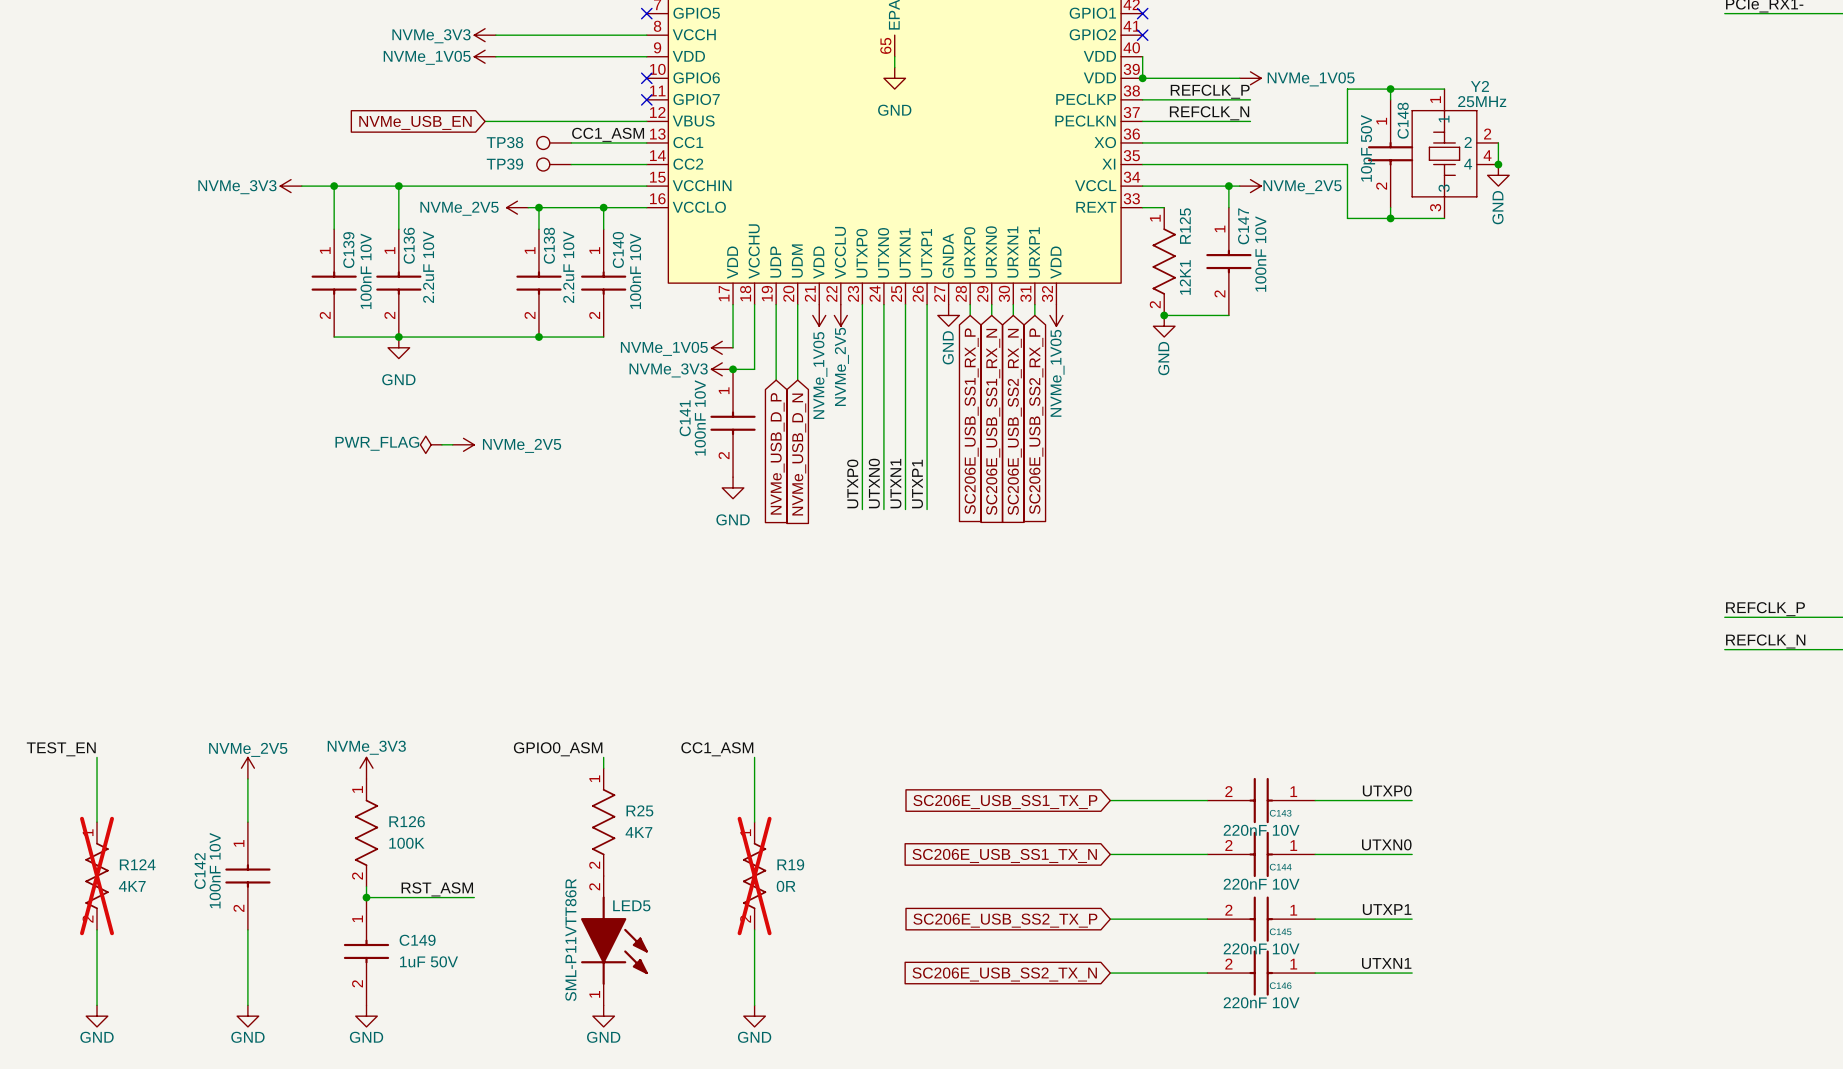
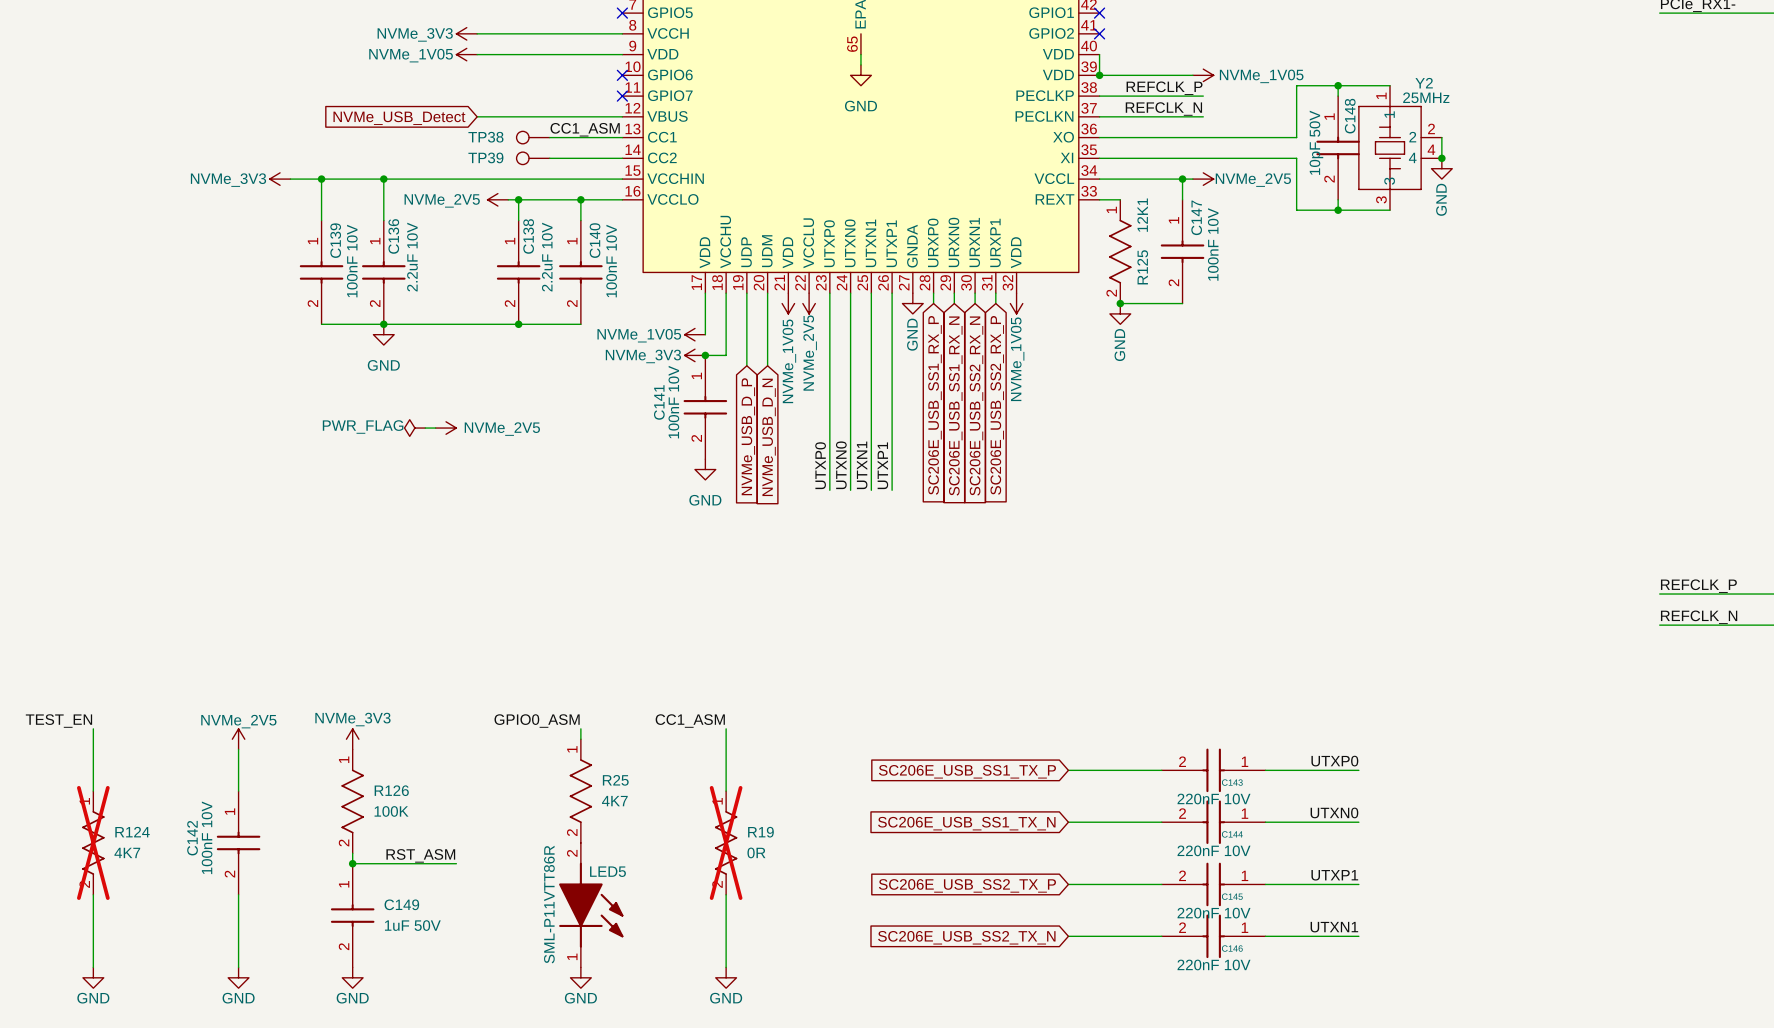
wire: (485, 121) (495, 121) -> none
global label: NVMe_USB_EN (415, 122) -> NVMe_USB_Detect (399, 118)
R125 name position: R125 (1185, 226) -> R125 (1142, 267)
R125 value position: 12K1 (1185, 277) -> 12K1 (1142, 215)

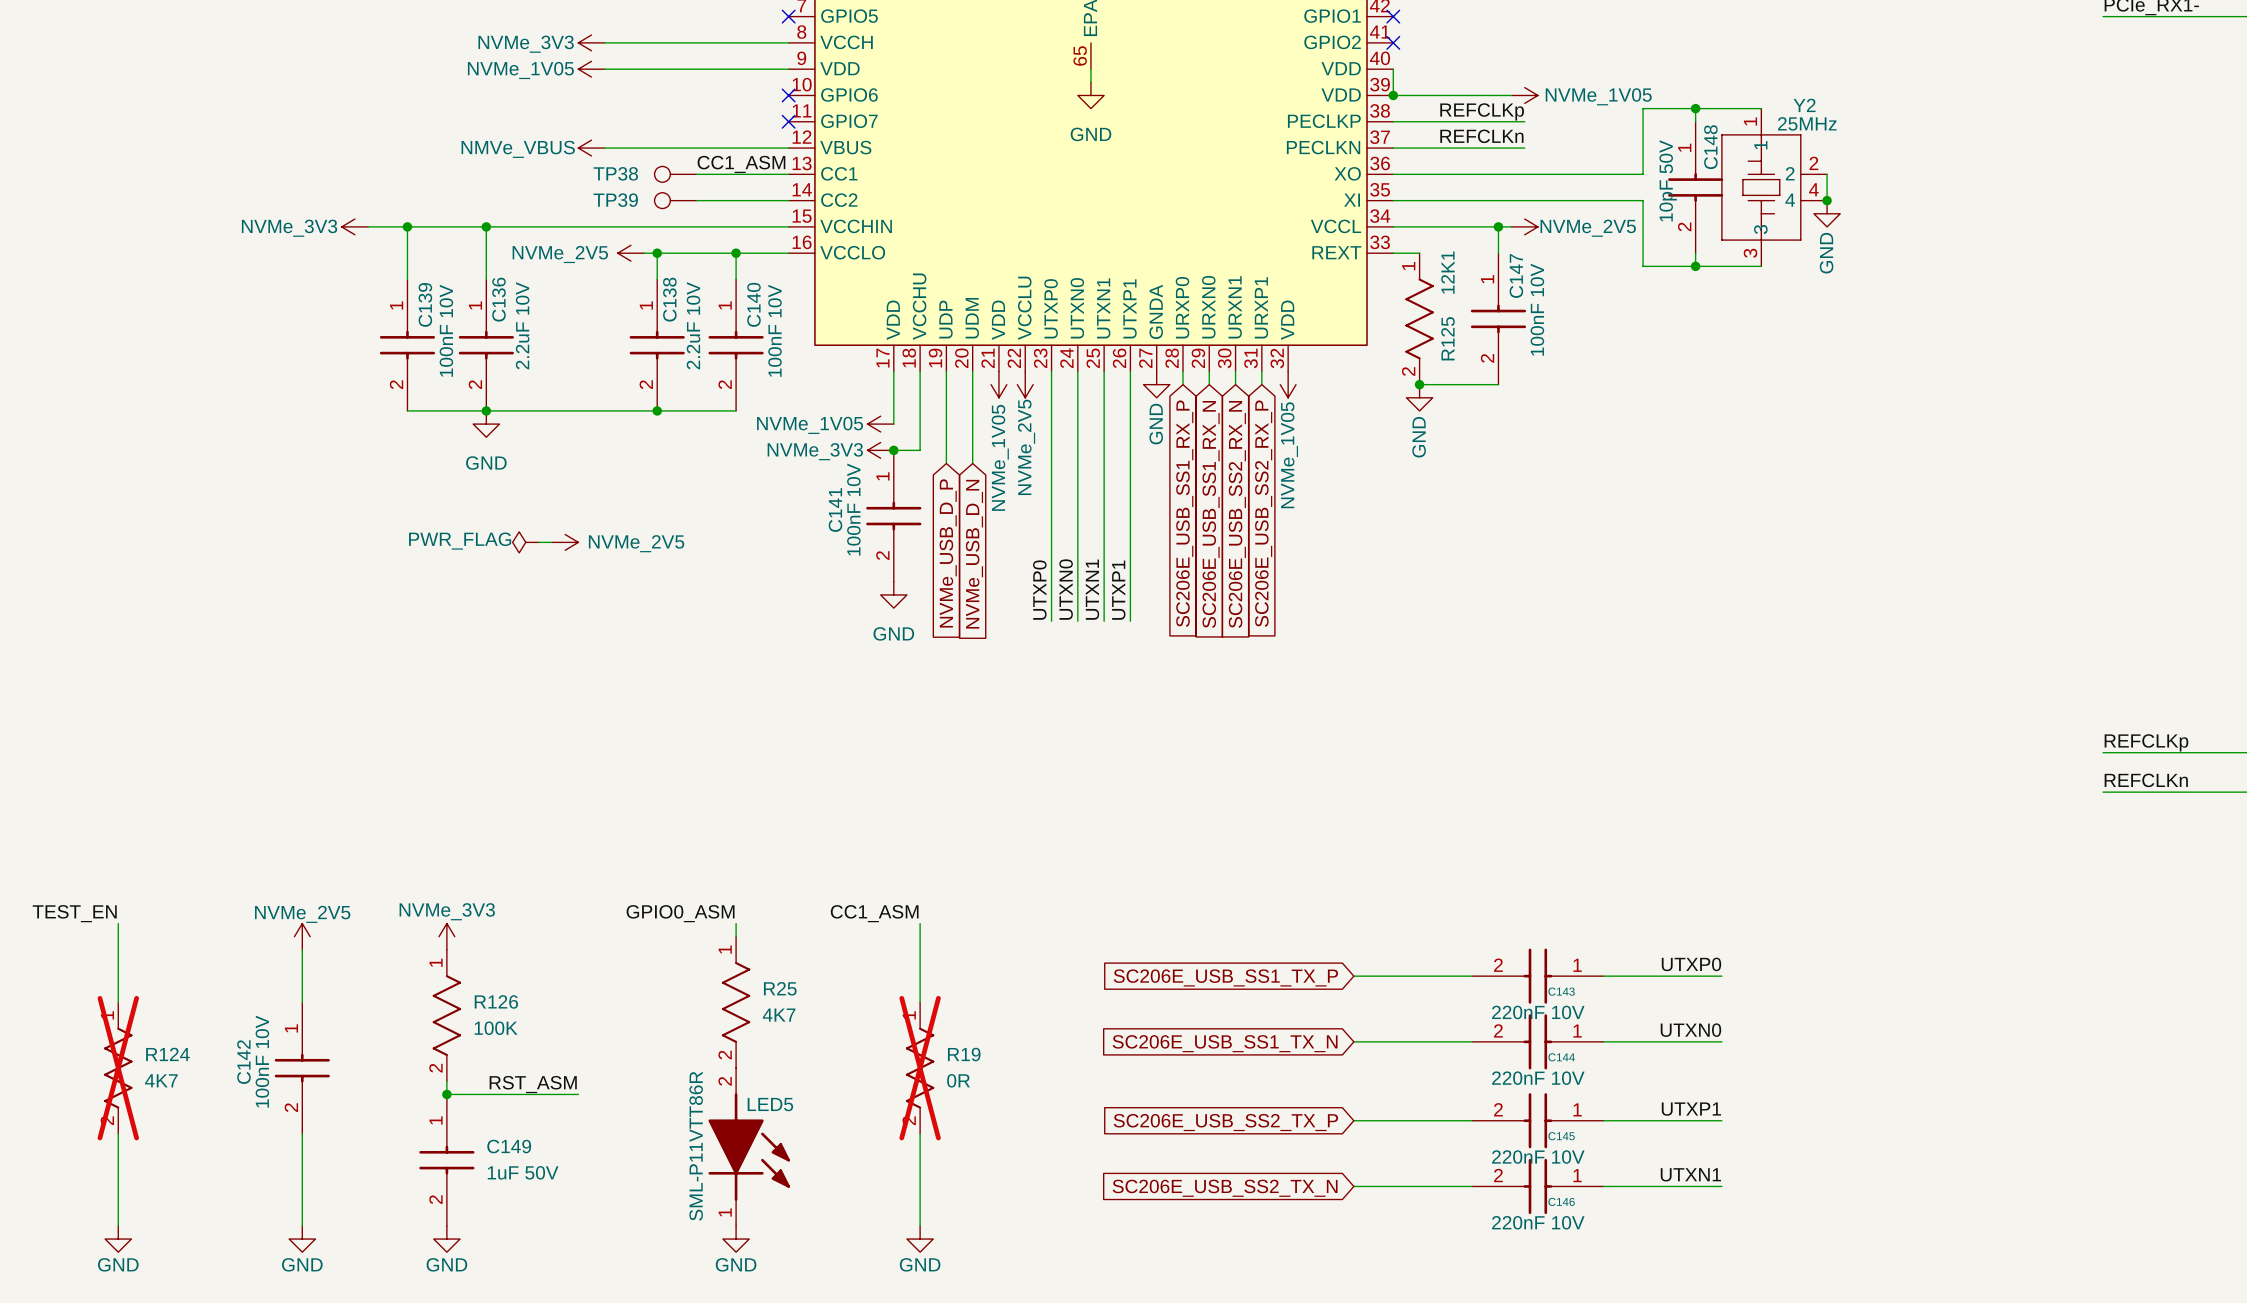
label: REFCLK_P (1164, 88) -> REFCLKp (1482, 111)
label: REFCLK_N (1163, 109) -> REFCLKn (1481, 136)
power symbol: none -> NMVe_VBUS (591, 148)
global label: NVMe_USB_Detect (399, 118) -> none
label: REFCLK_P (1698, 586) -> REFCLKp (2146, 742)
label: REFCLK_N (1699, 617) -> REFCLKn (2146, 780)

